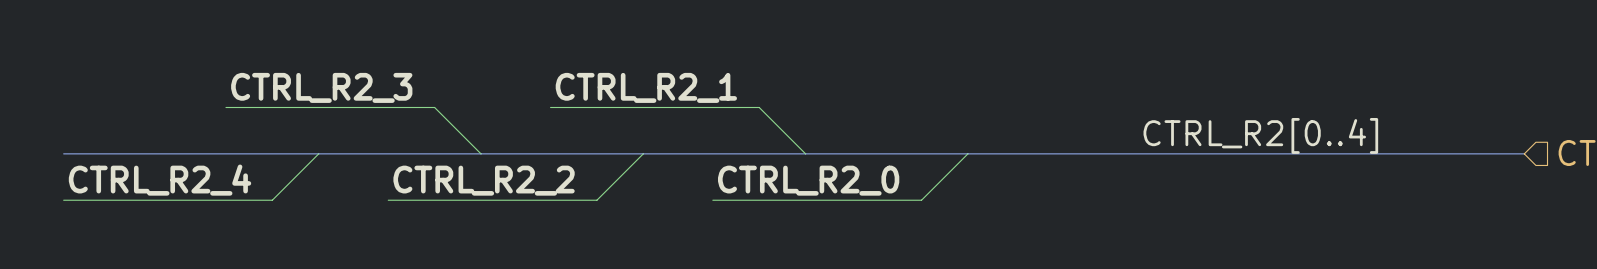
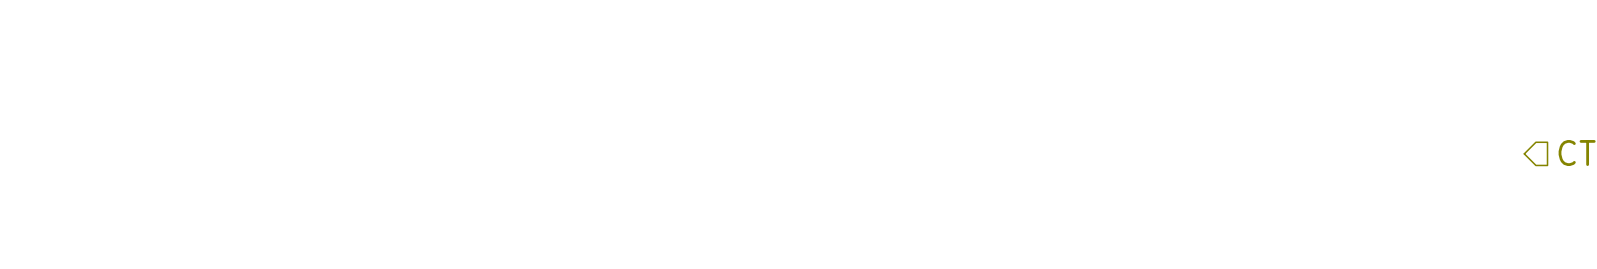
label: CTRL_R2_3 (321, 87) -> none
label: CTRL_R2_1 (646, 87) -> none
wire: (225, 107) (434, 107) (481, 153) -> none
wire: (550, 107) (759, 107) (805, 153) -> none
label: CTRL_R2[0..4] (1260, 135) -> none
bus: (63, 153) (1524, 153) -> none
wire: (318, 153) (272, 200) (63, 200) -> none
wire: (643, 153) (596, 200) (388, 200) -> none
wire: (967, 153) (921, 200) (712, 200) -> none
label: CTRL_R2_4 (160, 180) -> none
label: CTRL_R2_2 (484, 180) -> none
label: CTRL_R2_0 (808, 180) -> none

